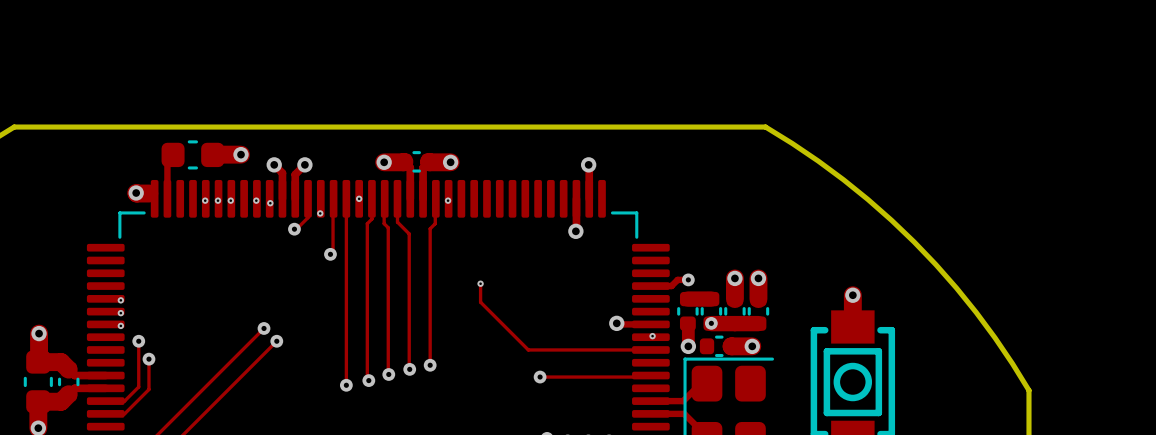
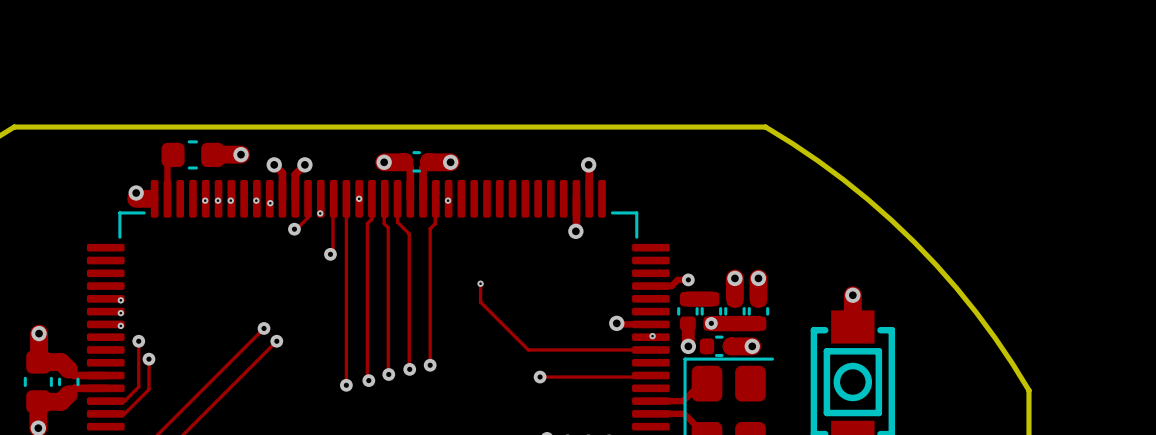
track: (136, 192) (149, 193) -> none
track: none -> (136, 198) (149, 198)

